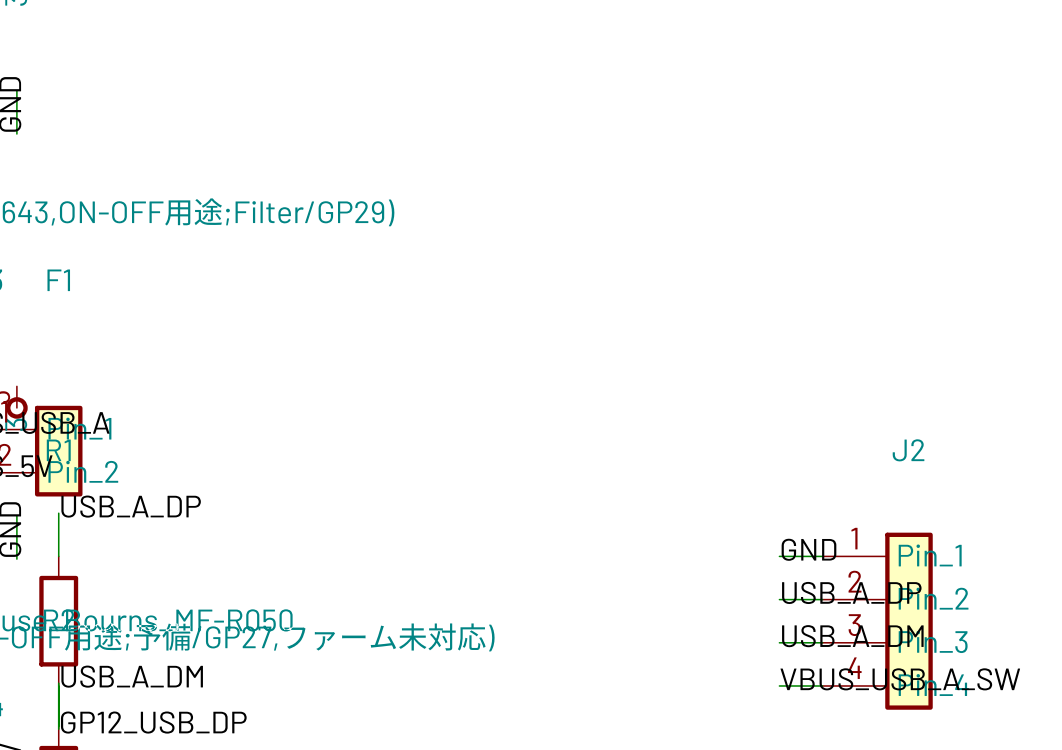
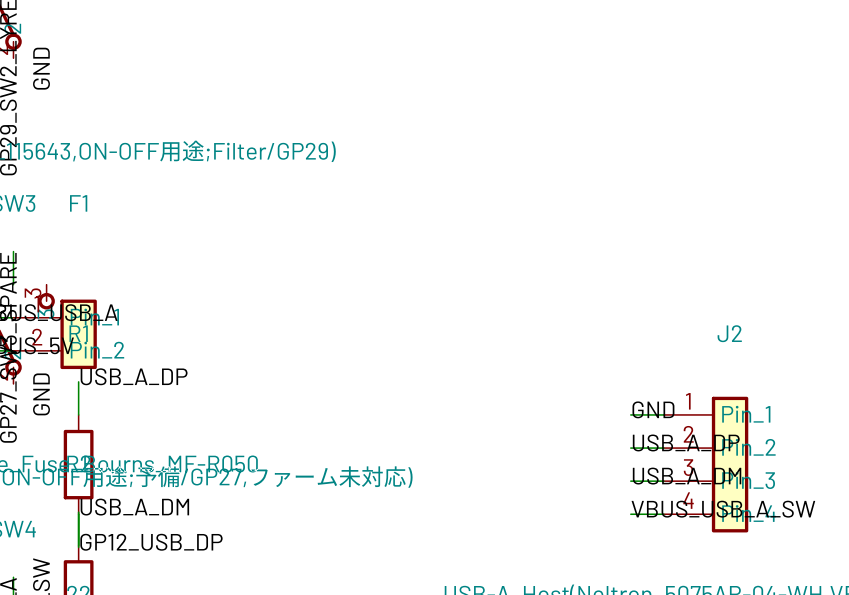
wire: (16, 90) (16, 134) -> none
wire: (16, 515) (16, 559) -> none

